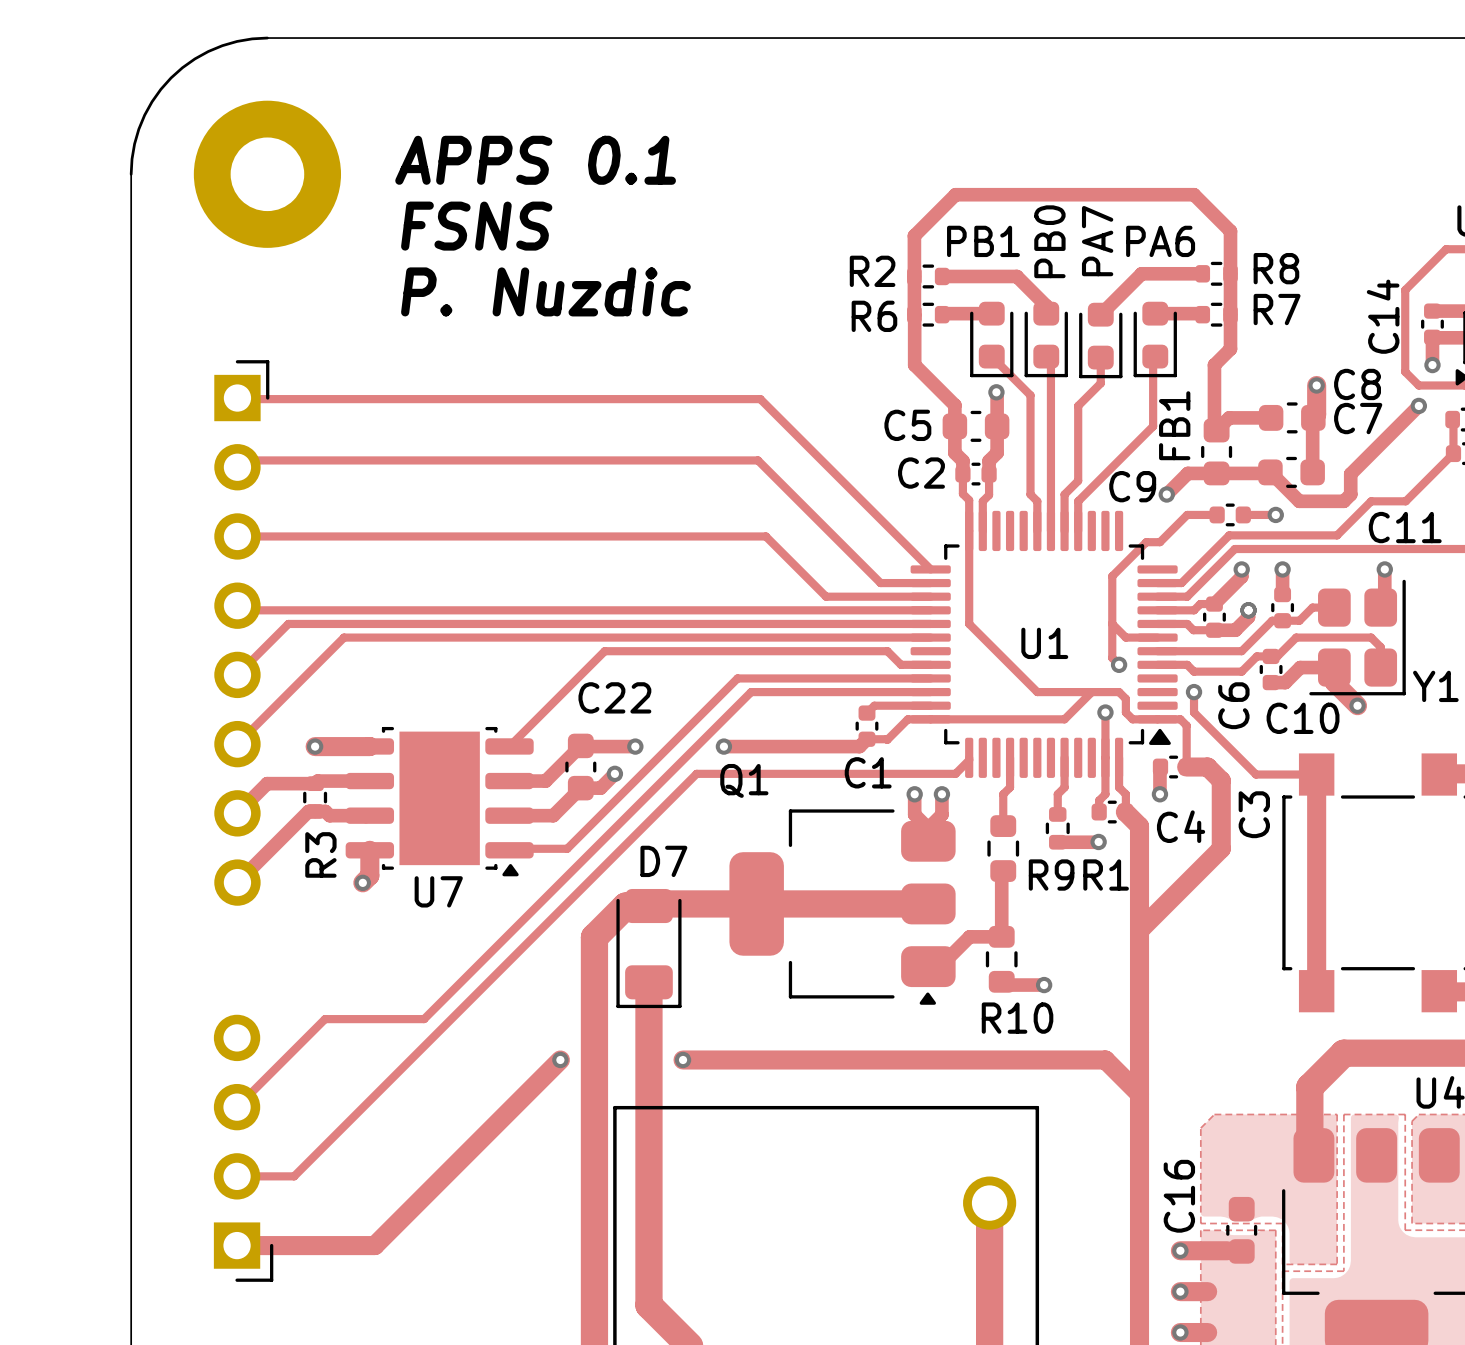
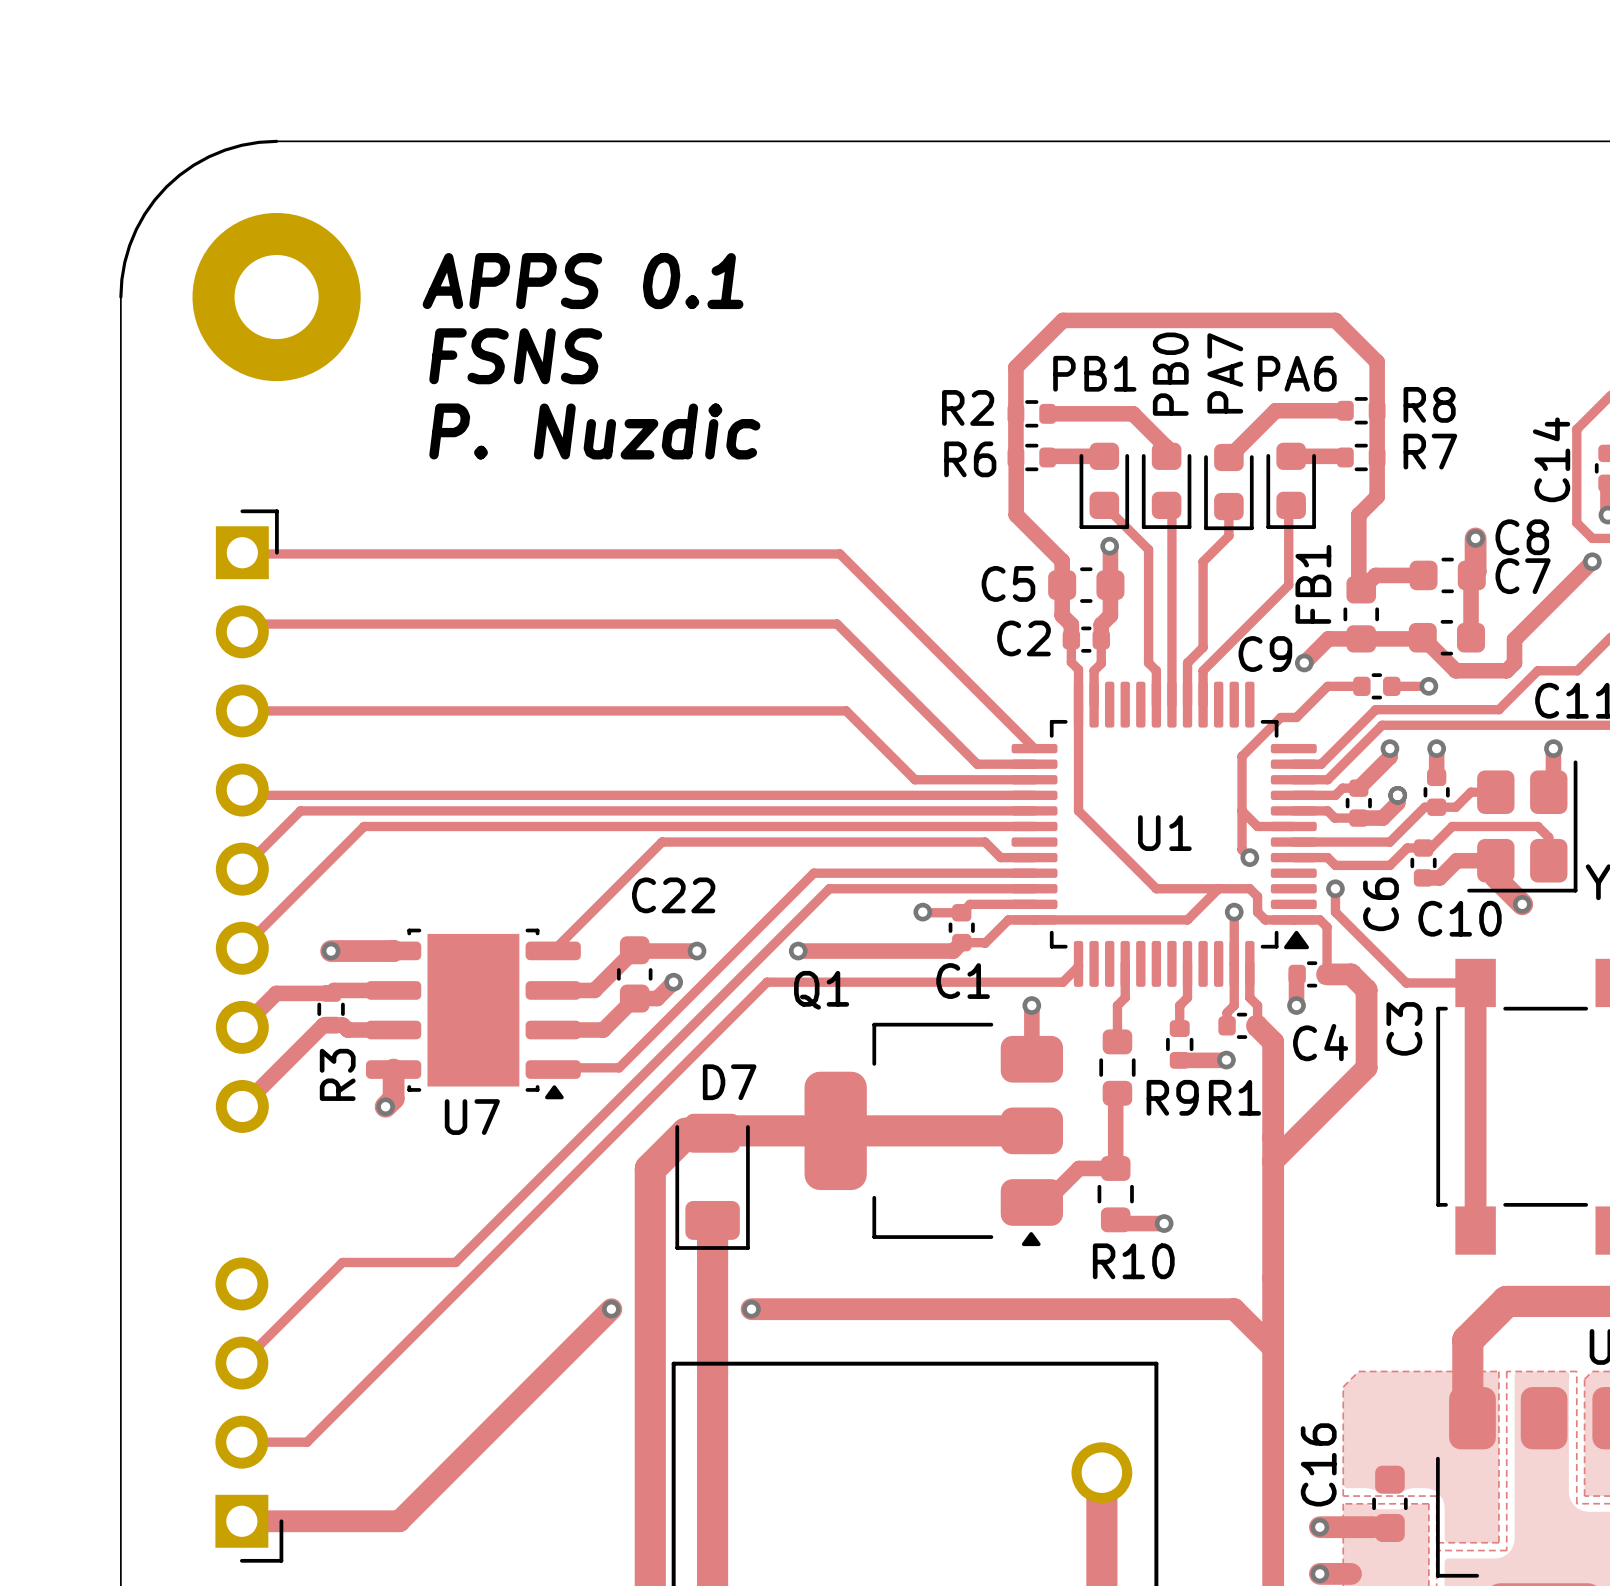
track: none -> (922, 912) (961, 912)
via: none -> (922, 912)
track: (914, 794) (914, 814) (928, 828) (941, 814) (941, 794) -> none
via: (914, 794) -> none
track: none -> (1031, 1005) (1031, 1044)
via: none -> (1031, 1005)
via: (941, 794) -> none

